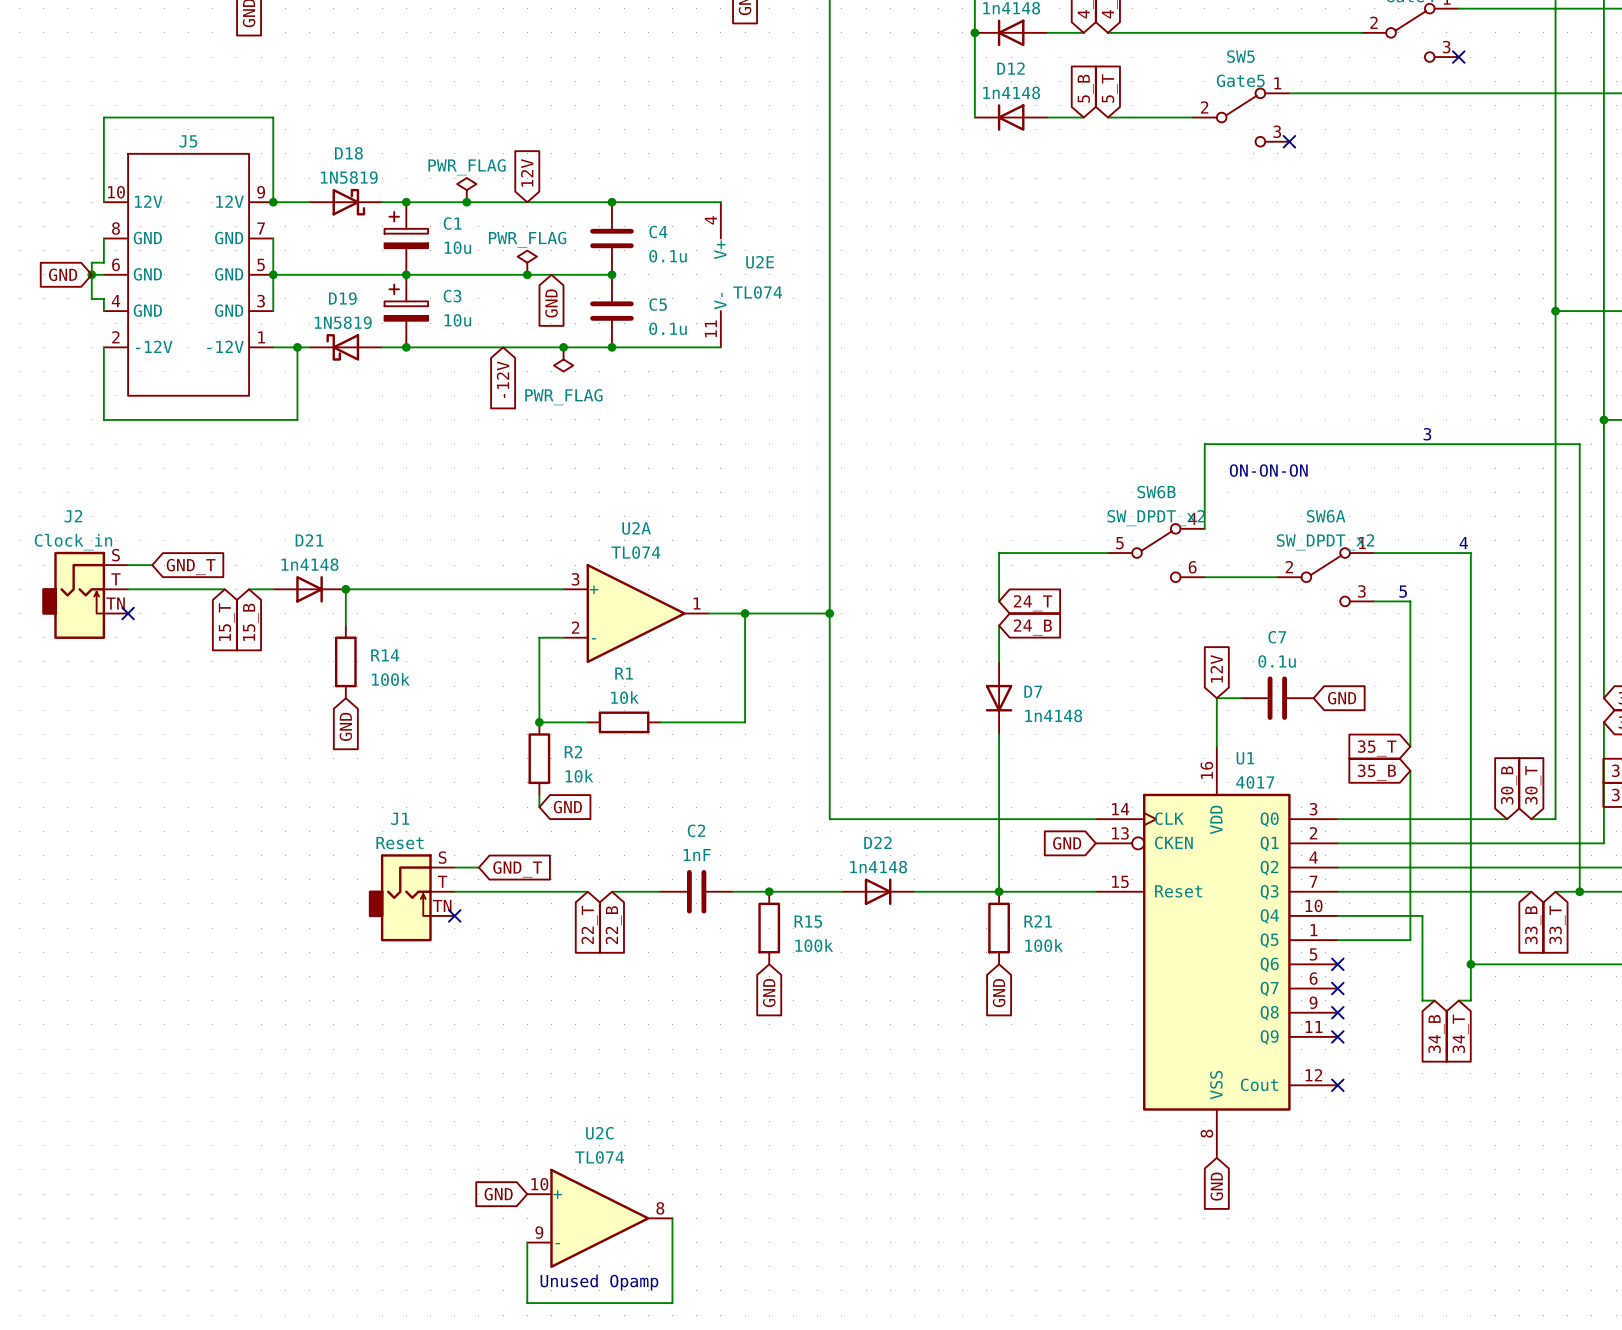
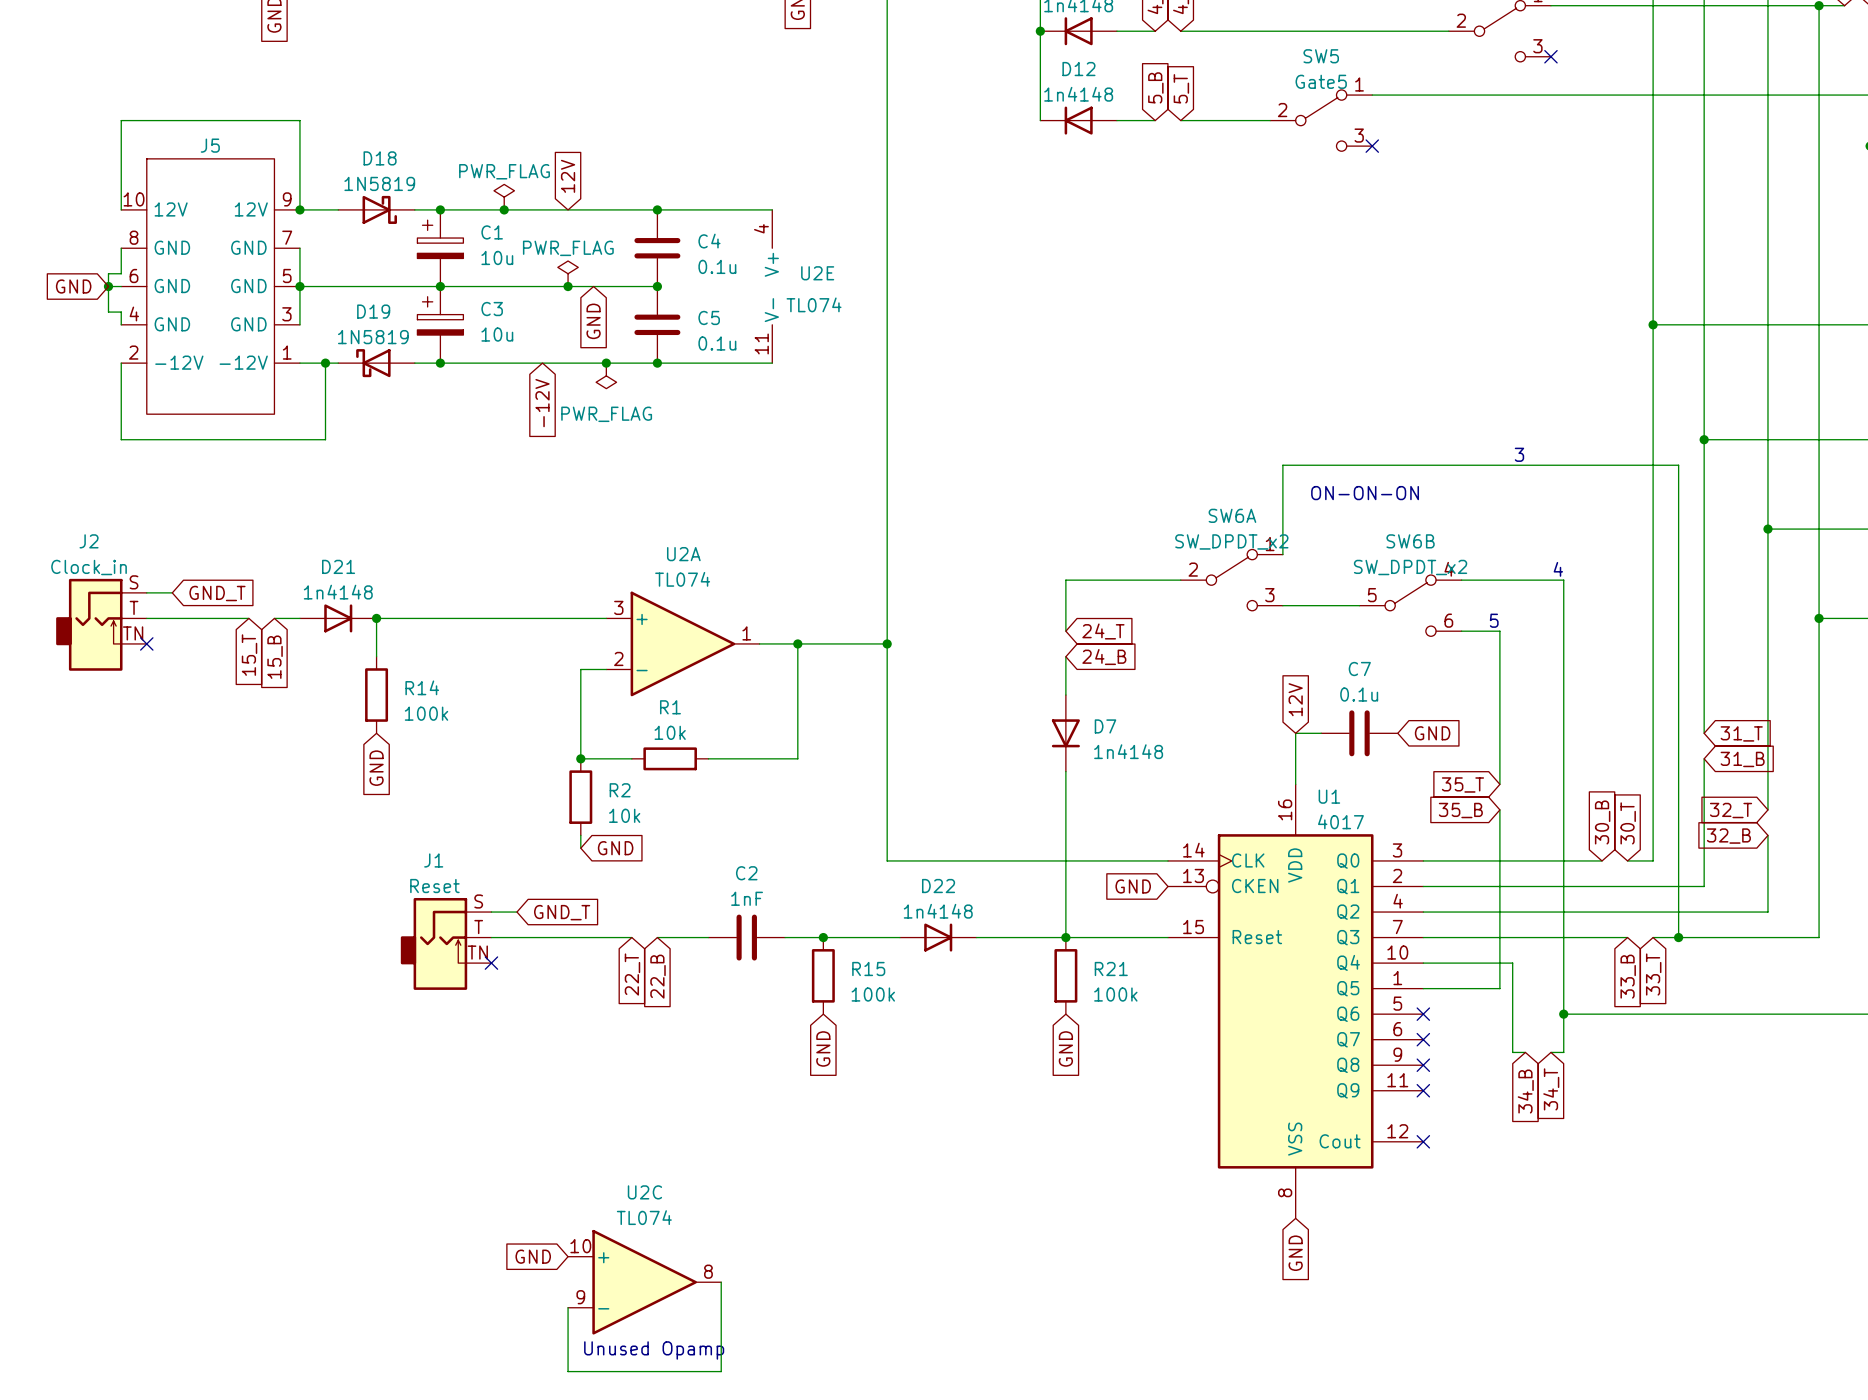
SW6B position: (1156, 553) -> (1410, 605)
SW6A position: (1325, 577) -> (1231, 580)

